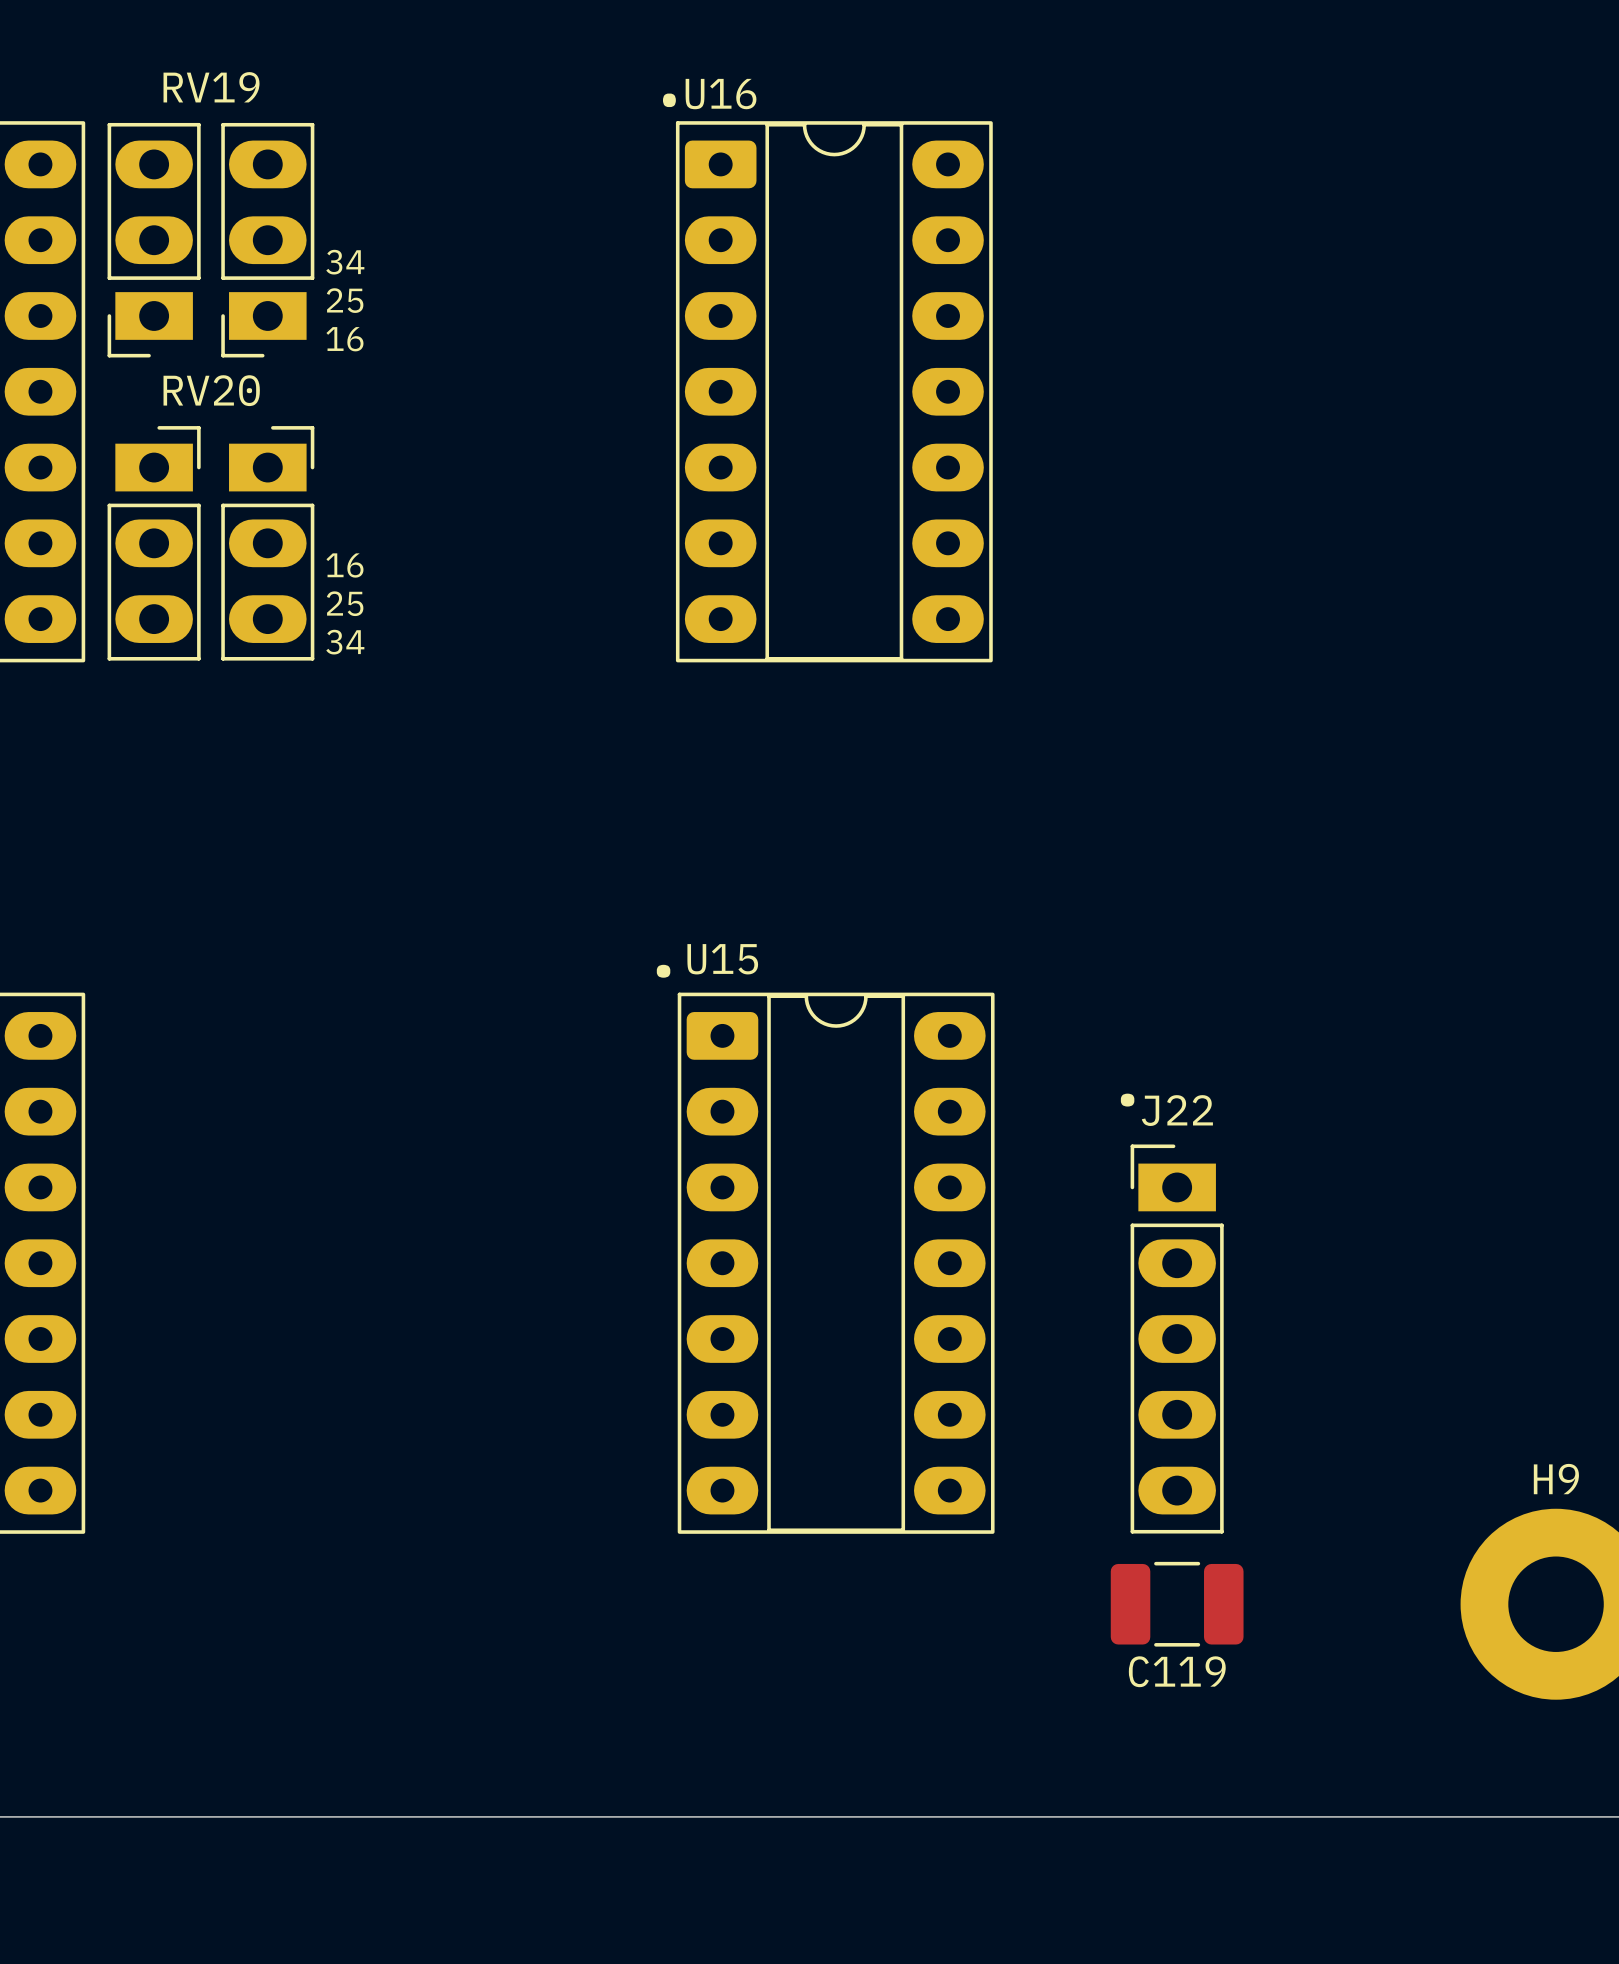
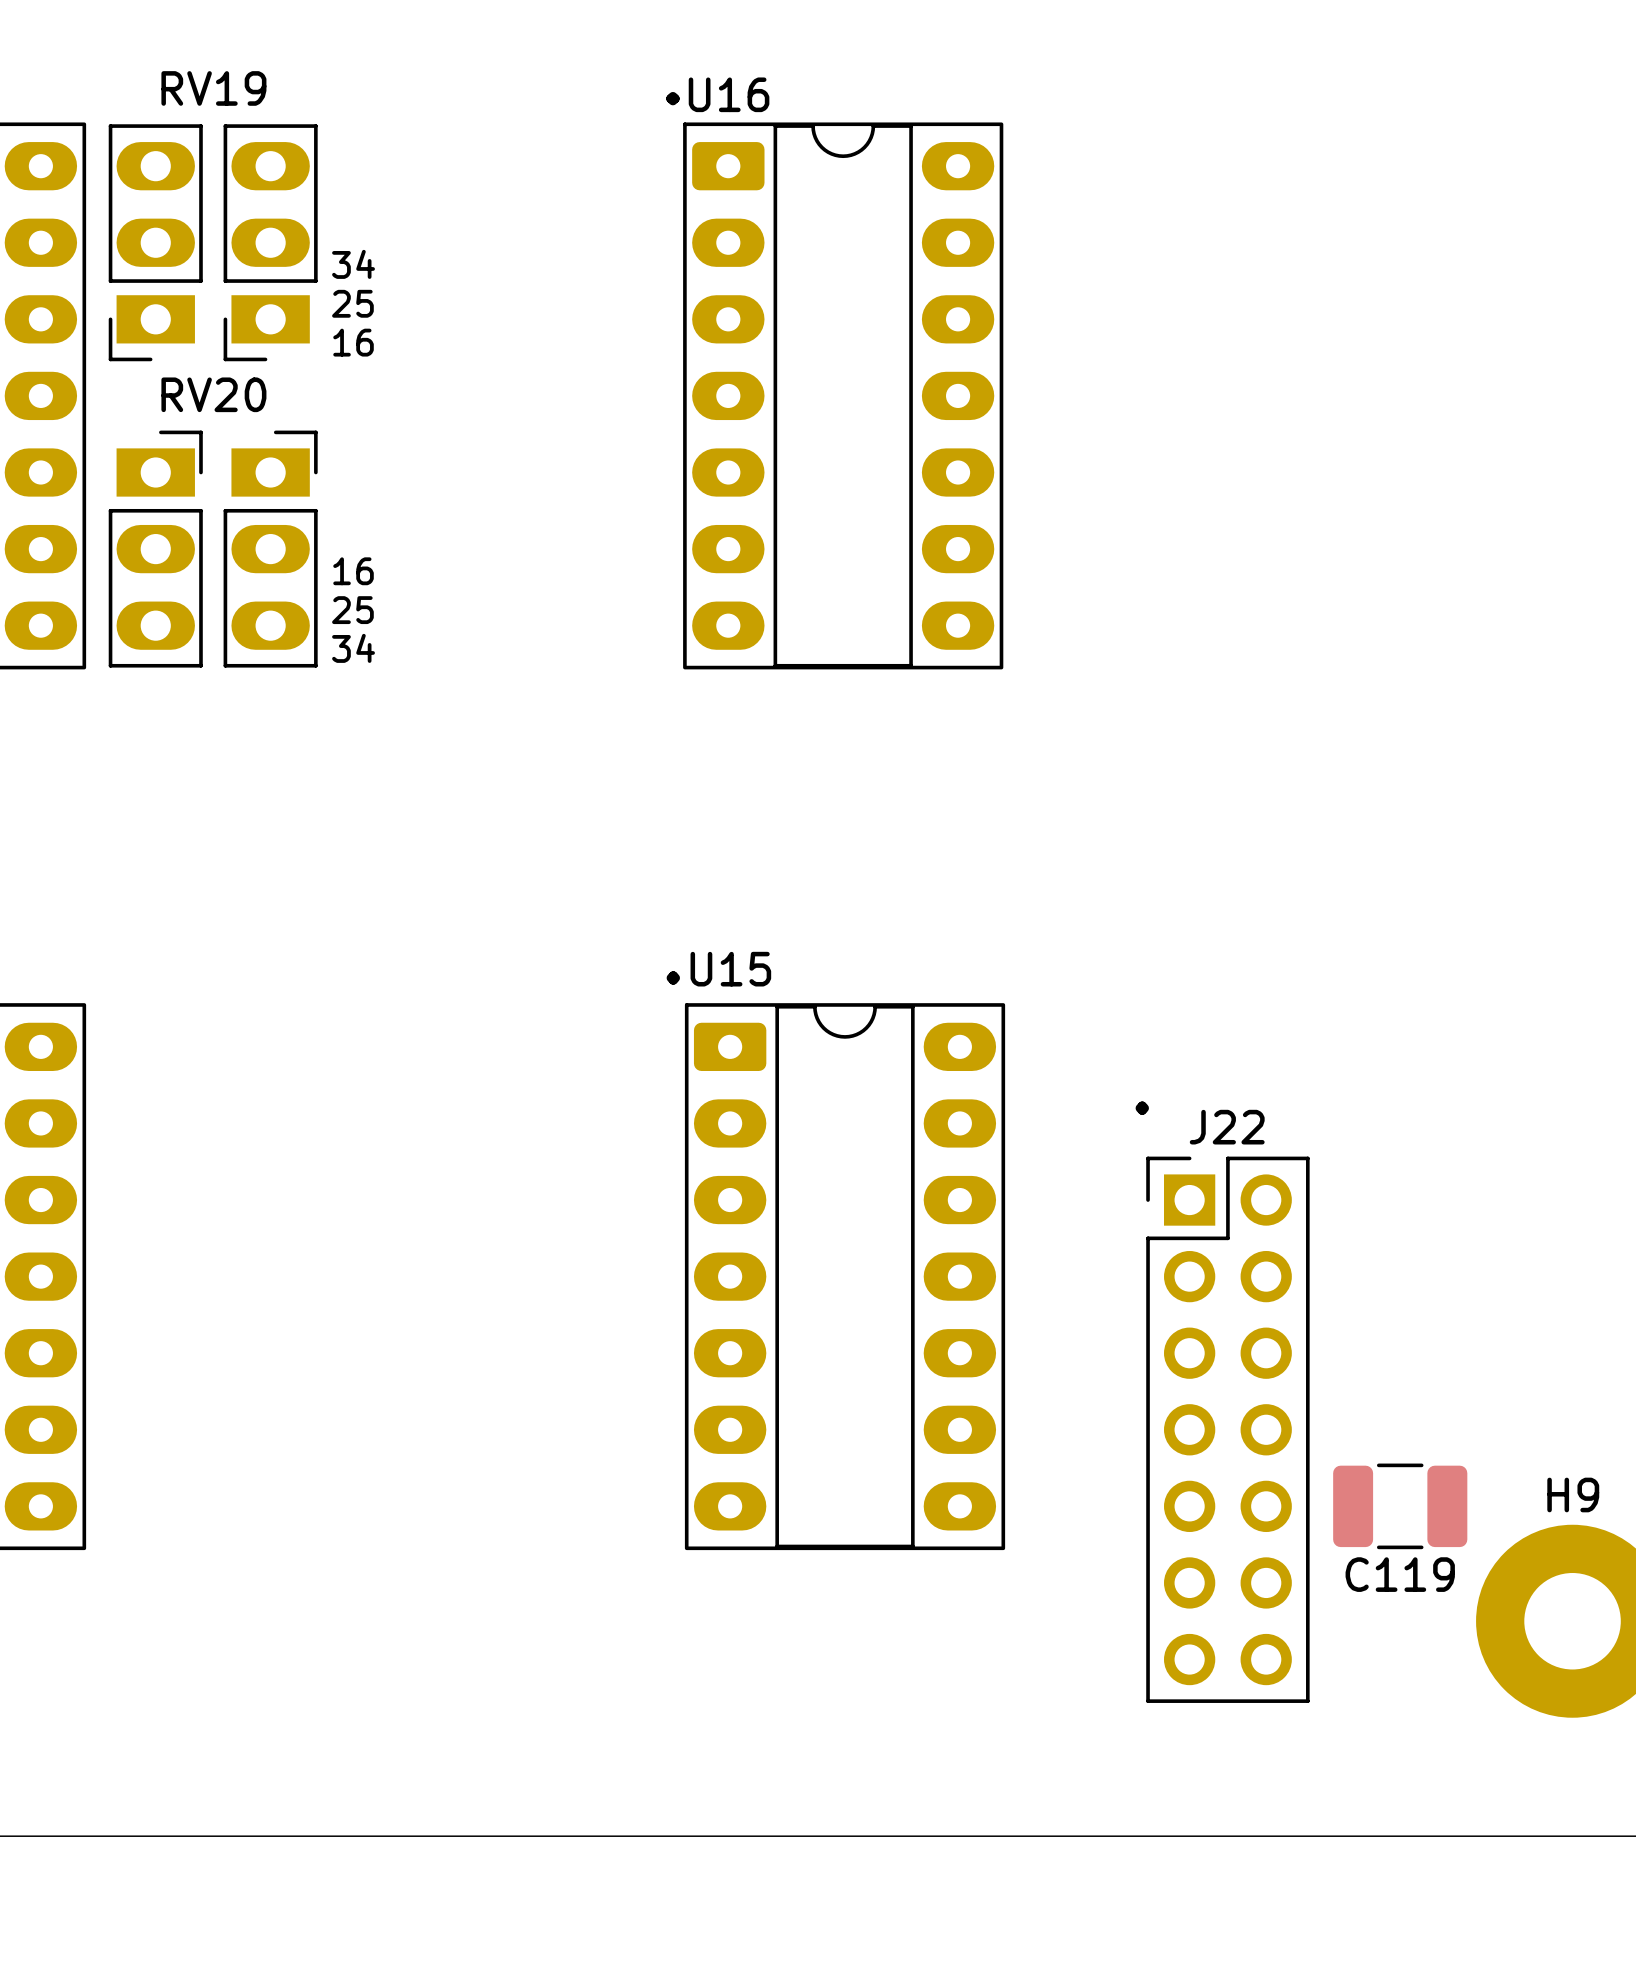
J22 name position: J22 (1177, 1110) -> J22 (1227, 1127)
J22 footprint: [1130, 1144, 1224, 1534] -> [1146, 1156, 1310, 1703]
C119 position: (1177, 1604) -> (1400, 1506)

